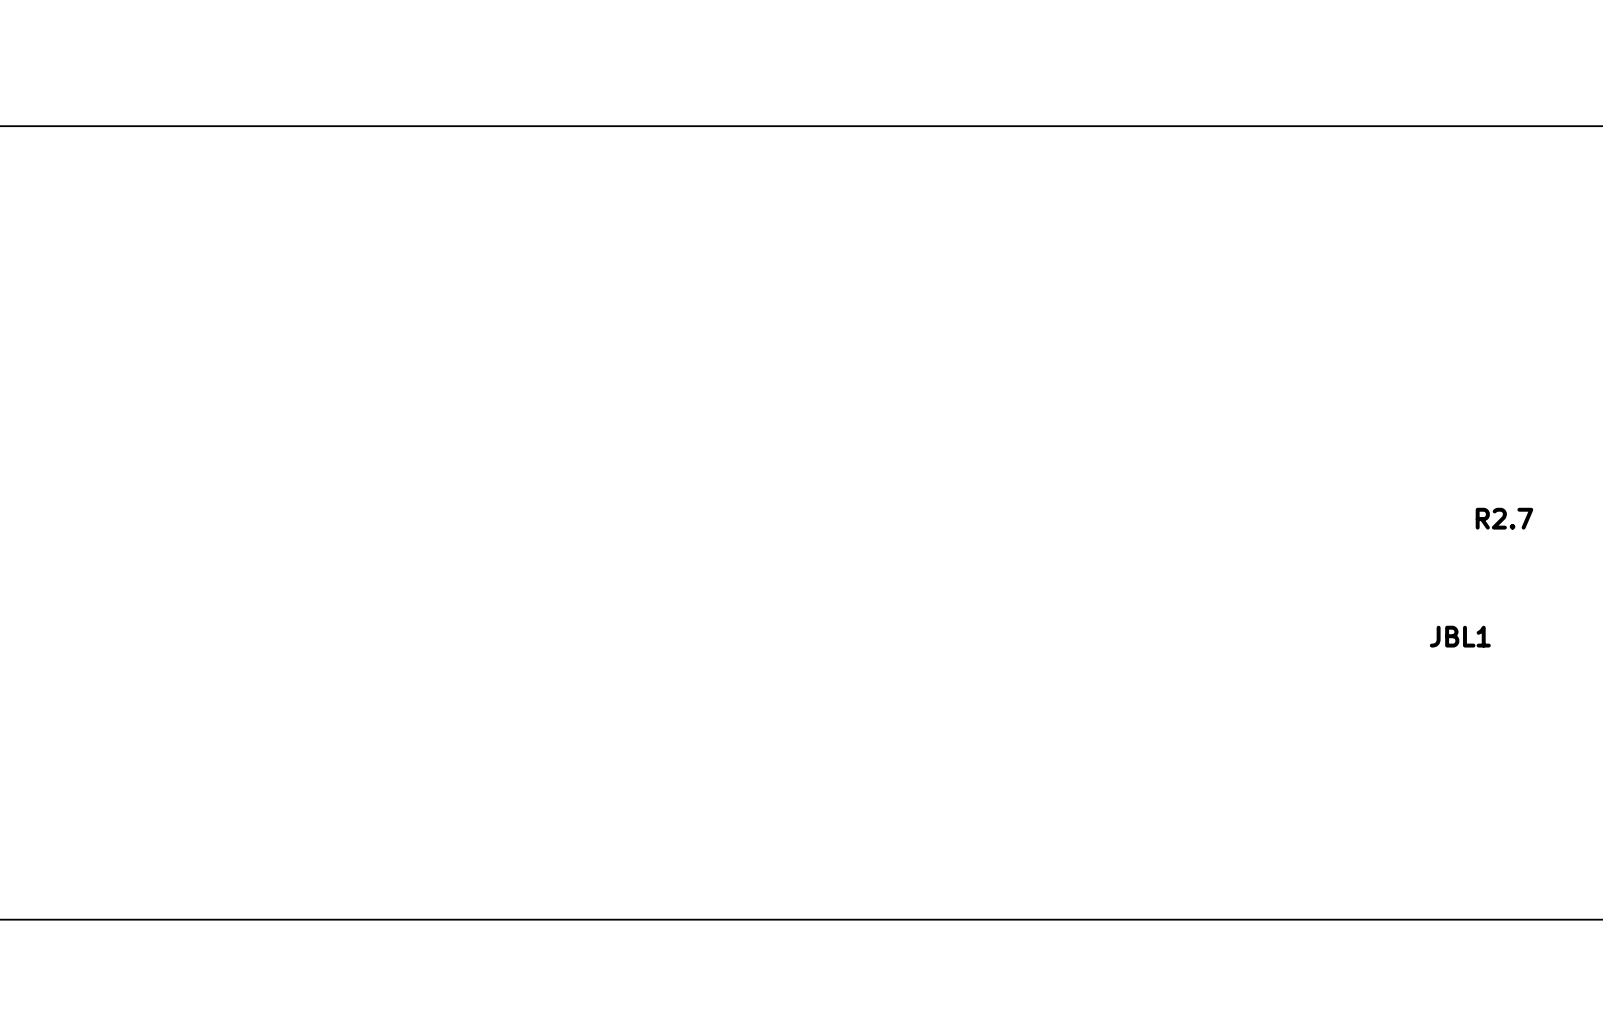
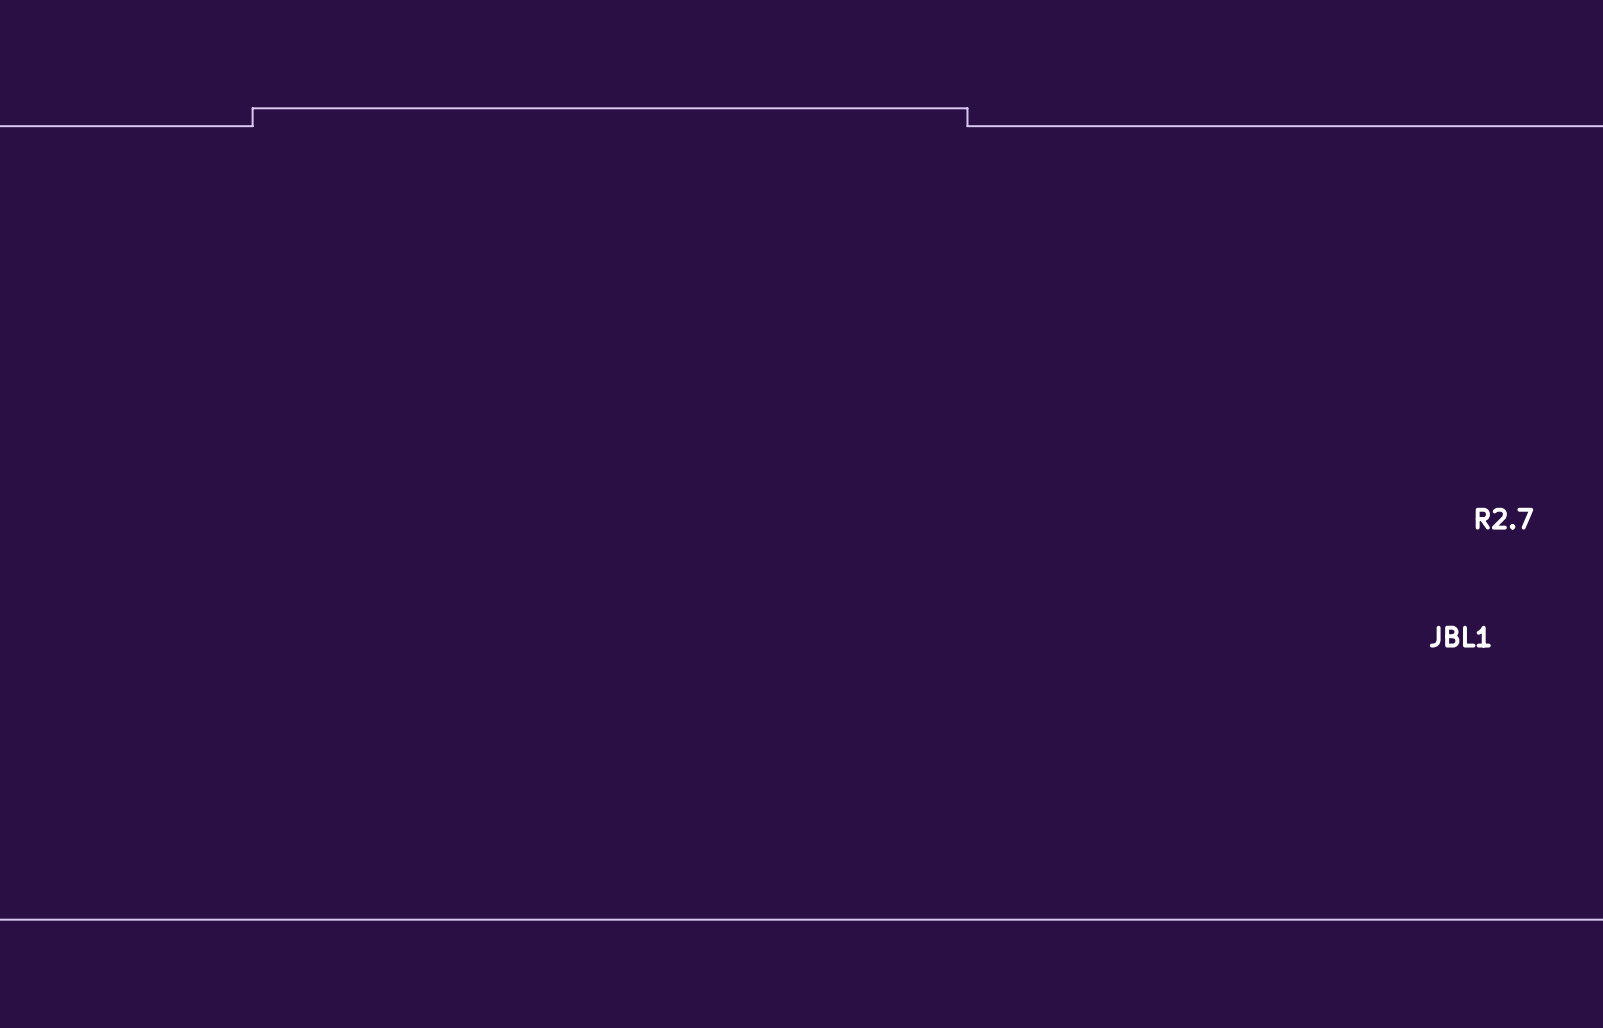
board edge: (252, 126) (967, 126) -> (252, 126) (252, 108) (967, 108) (967, 126)

